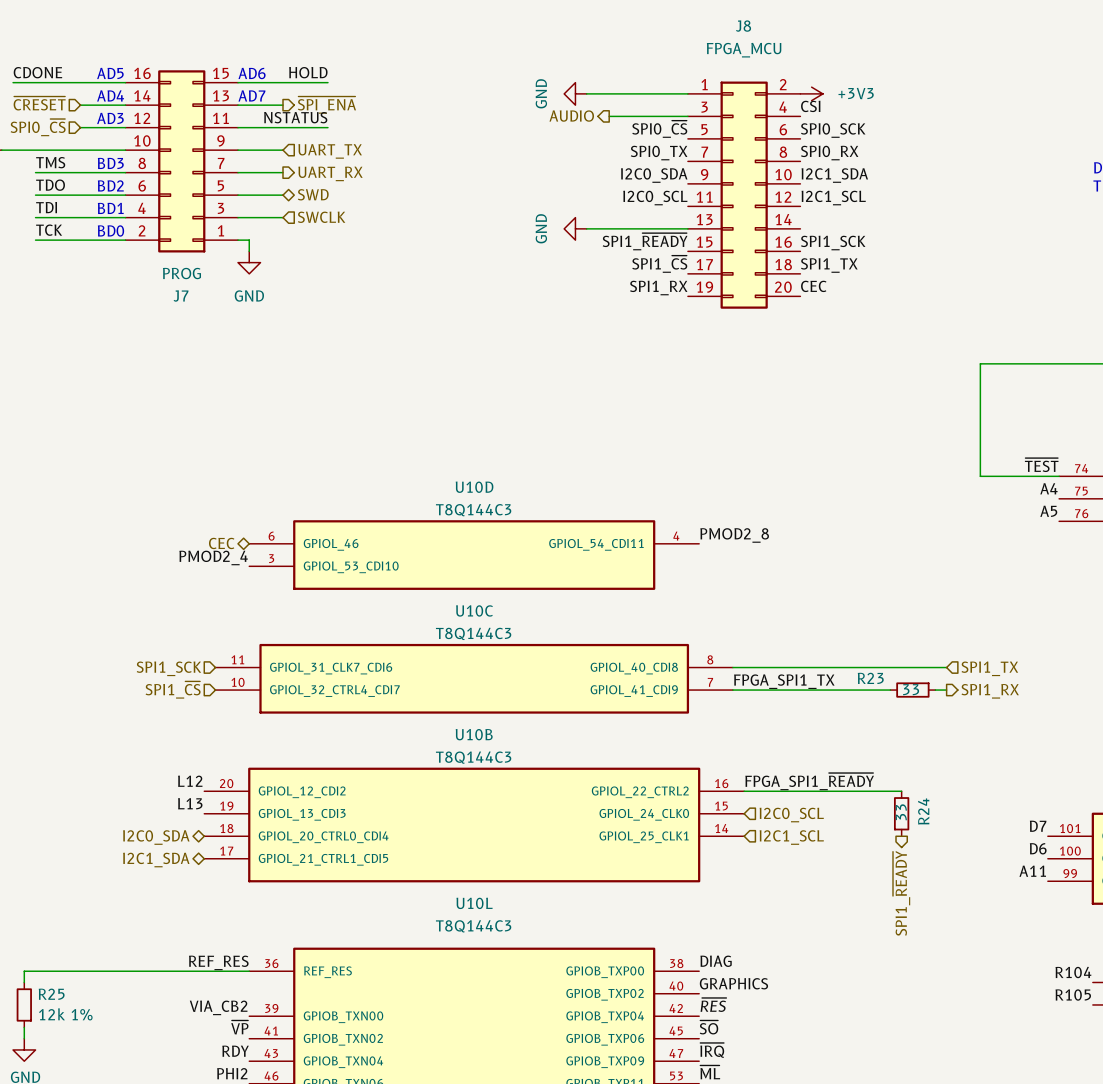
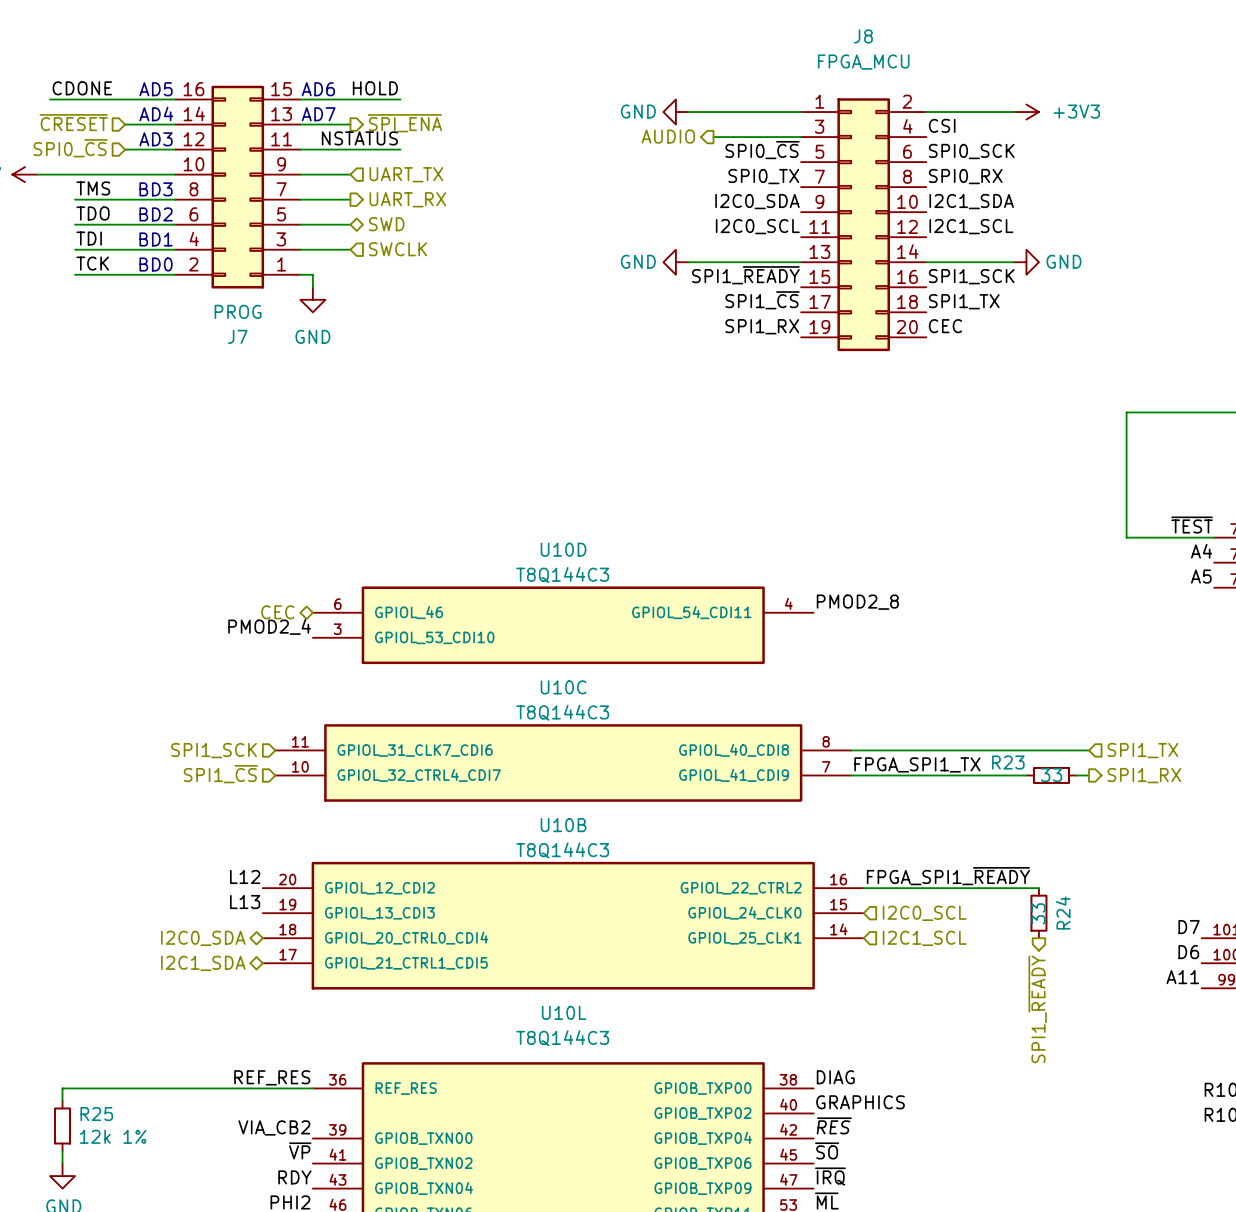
power symbol text rotation: 0° (541, 93) -> 90° clockwise (638, 111)
wire: none -> (926, 112) (1013, 112)
power symbol position: +3V3 (811, 93) -> +3V3 (1026, 112)
power symbol text rotation: 0° (541, 228) -> 90° clockwise (638, 261)
wire: none -> (926, 262) (1013, 262)
power symbol: none -> GND (1026, 262)

